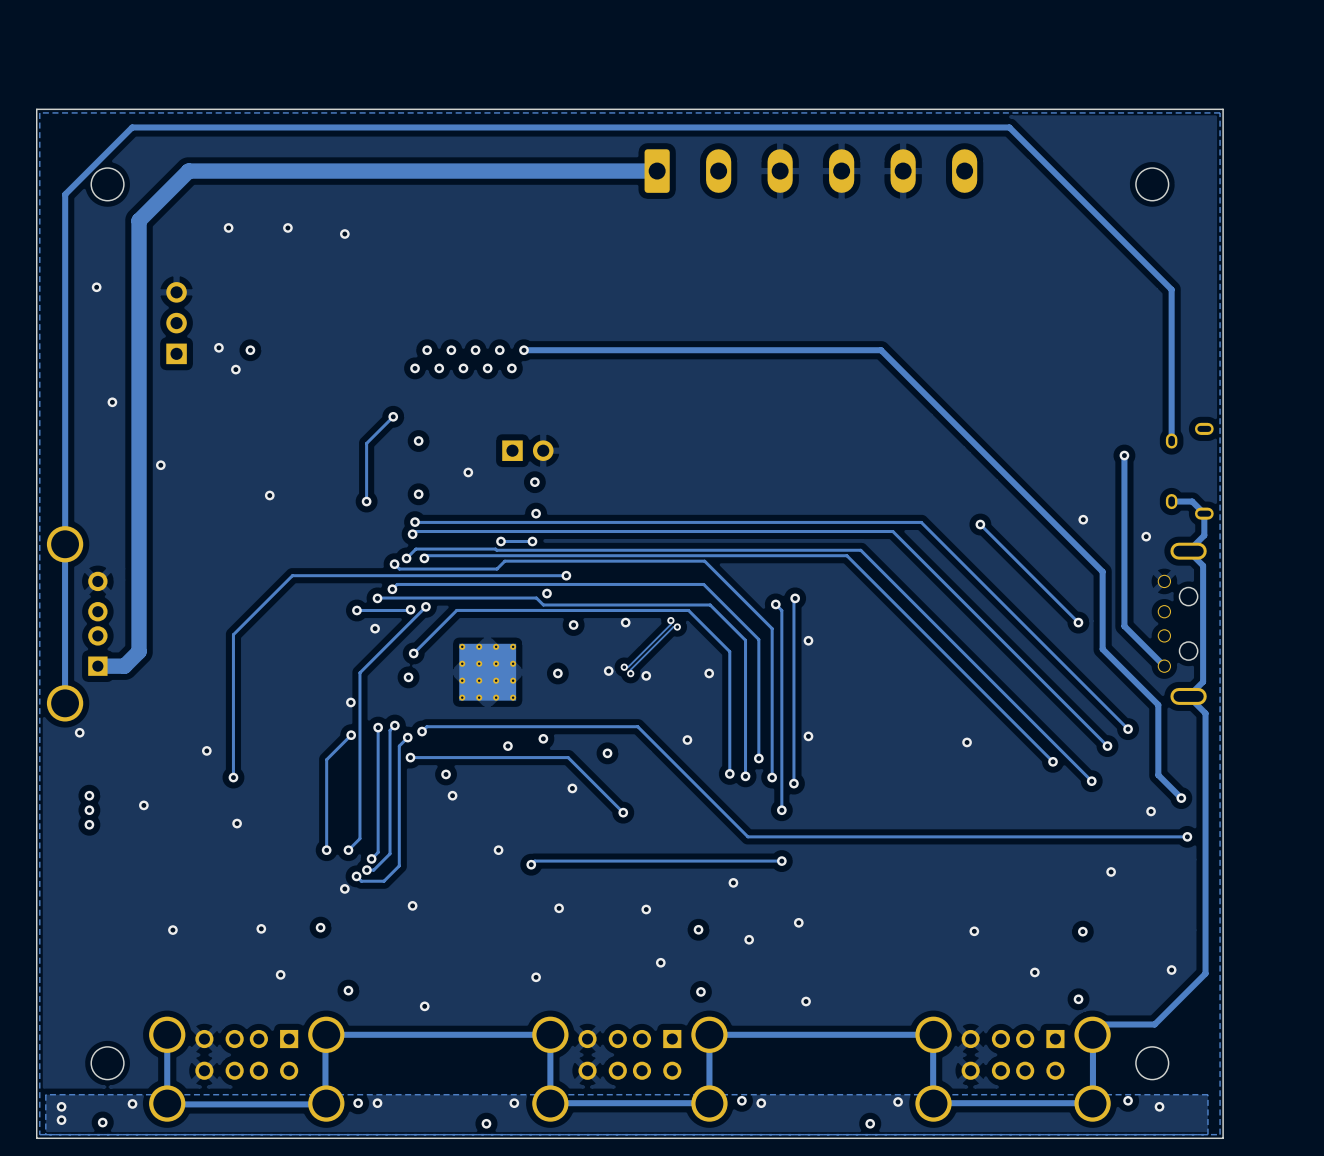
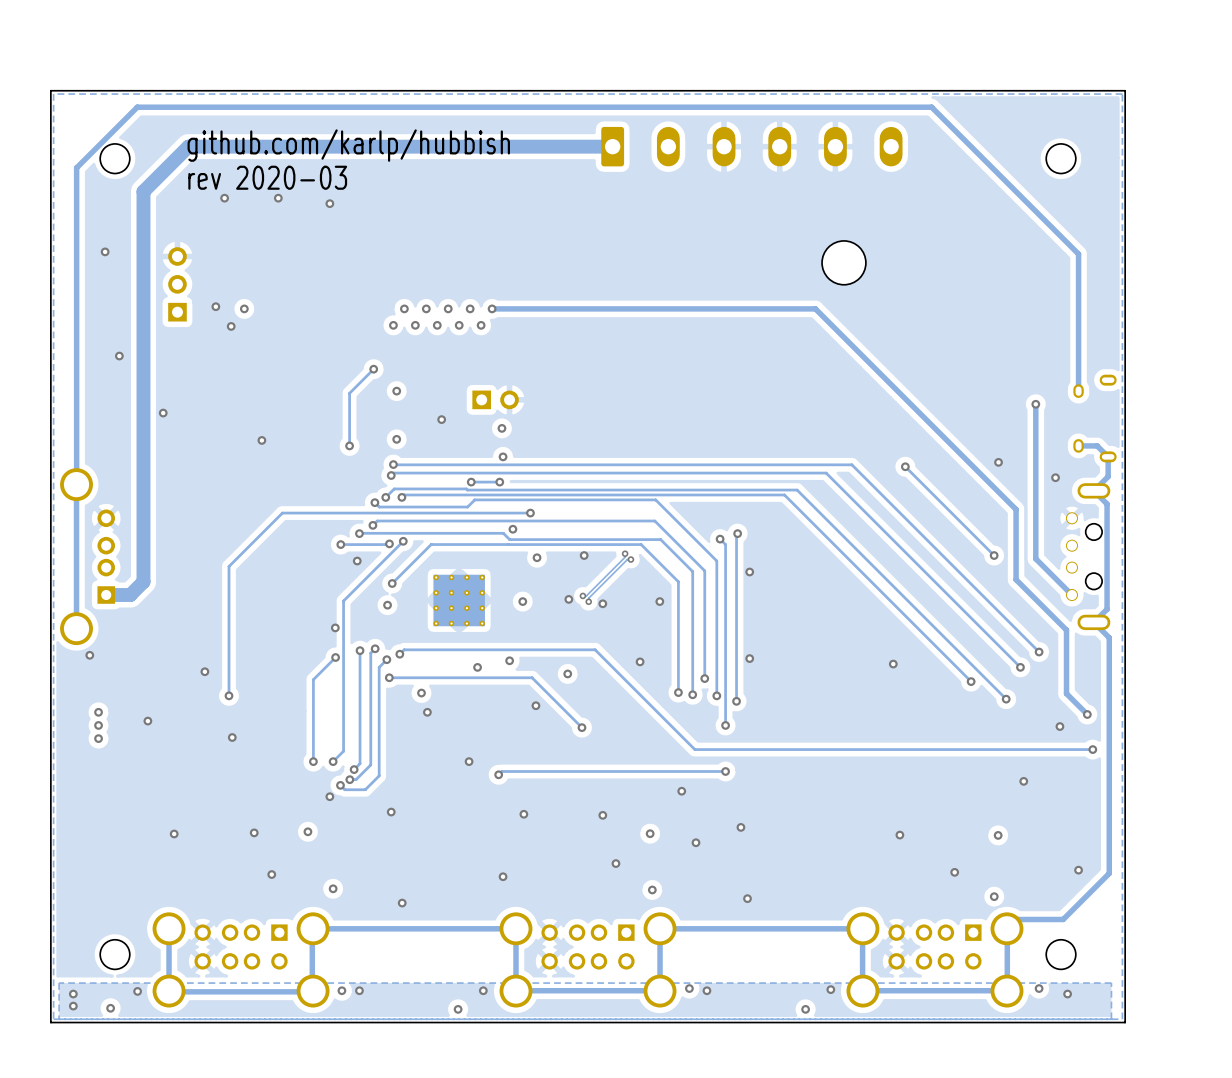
text: none -> github.com/karlp/hubbish (348, 145)
text: none -> rev 2020-03 (267, 177)
part: none -> (843, 262)

